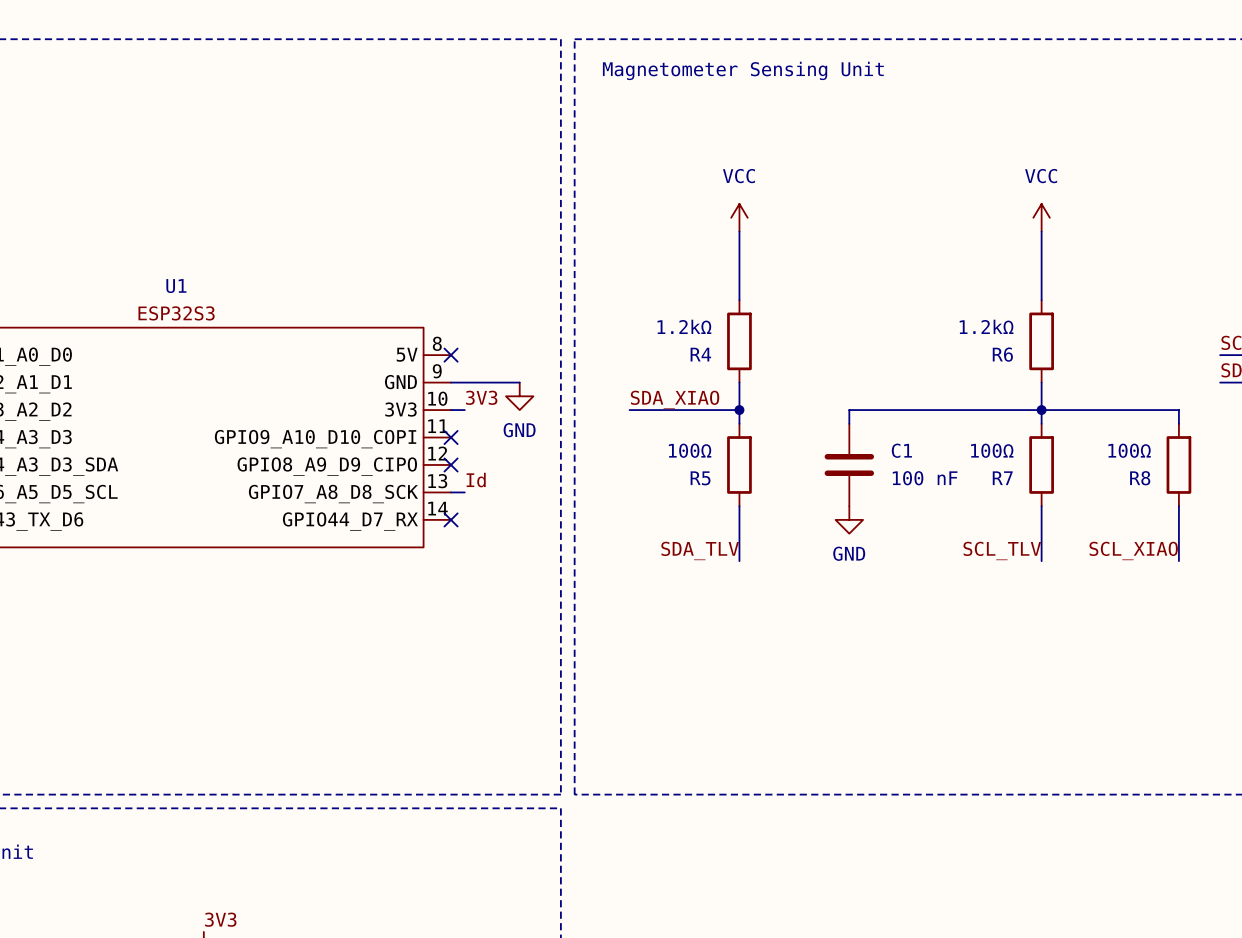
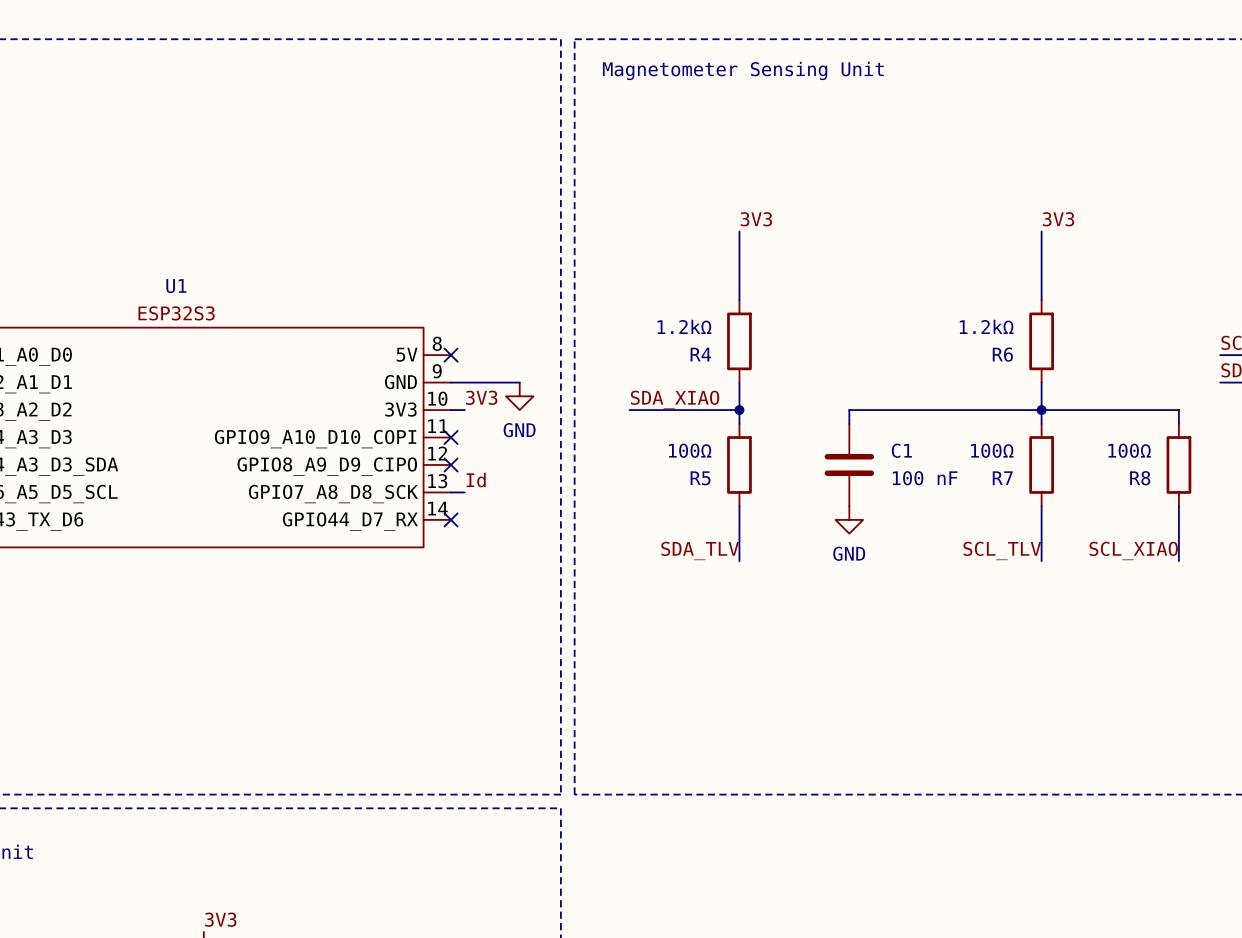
power symbol: VCC (739, 217) -> none
power symbol: VCC (1041, 217) -> none
label: none -> 3V3 (756, 219)
label: none -> 3V3 (1058, 219)

